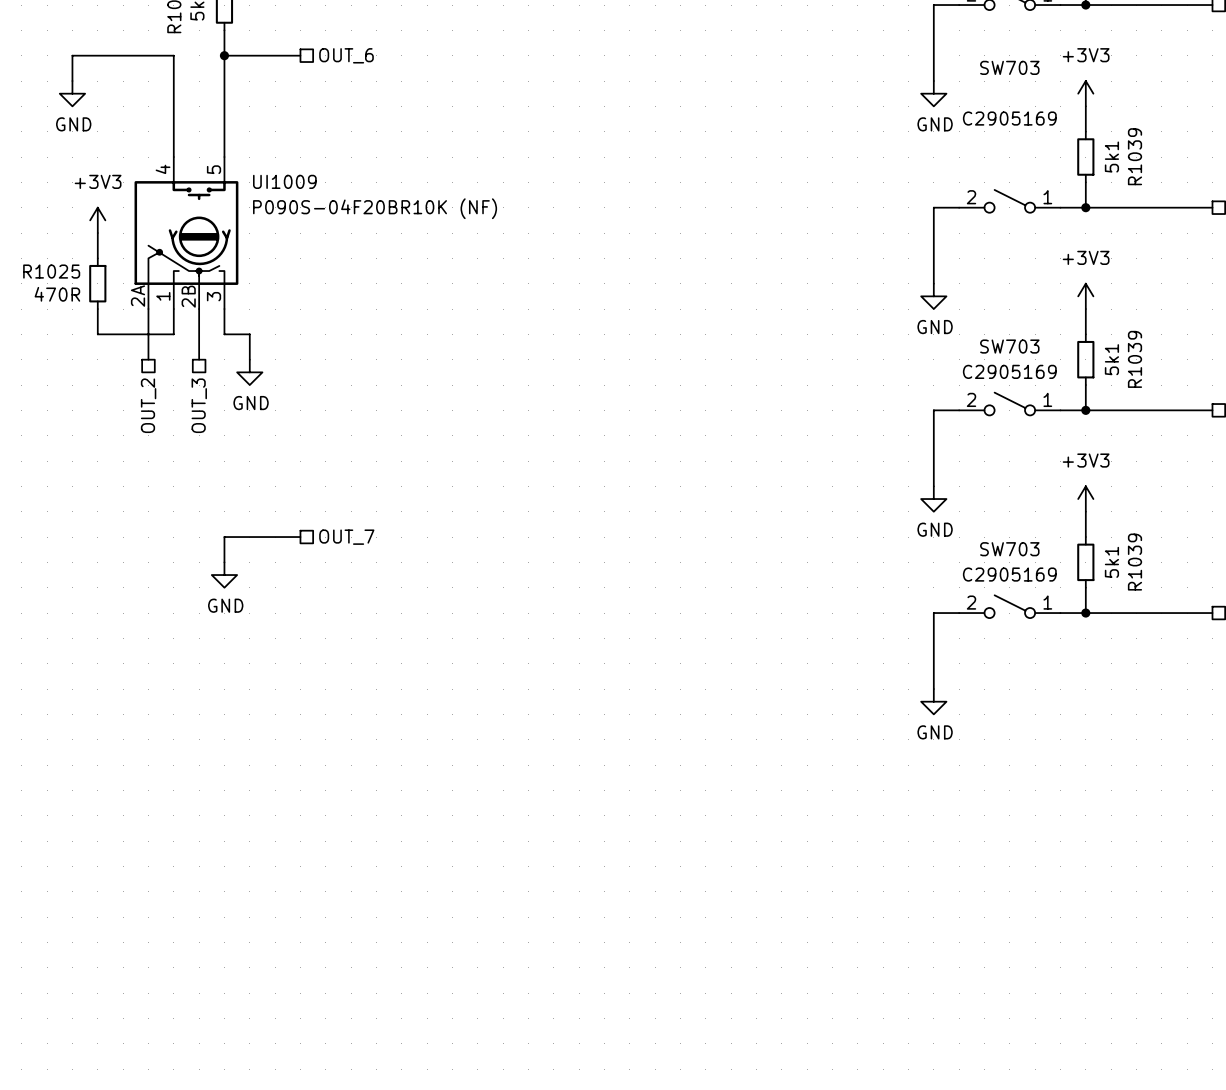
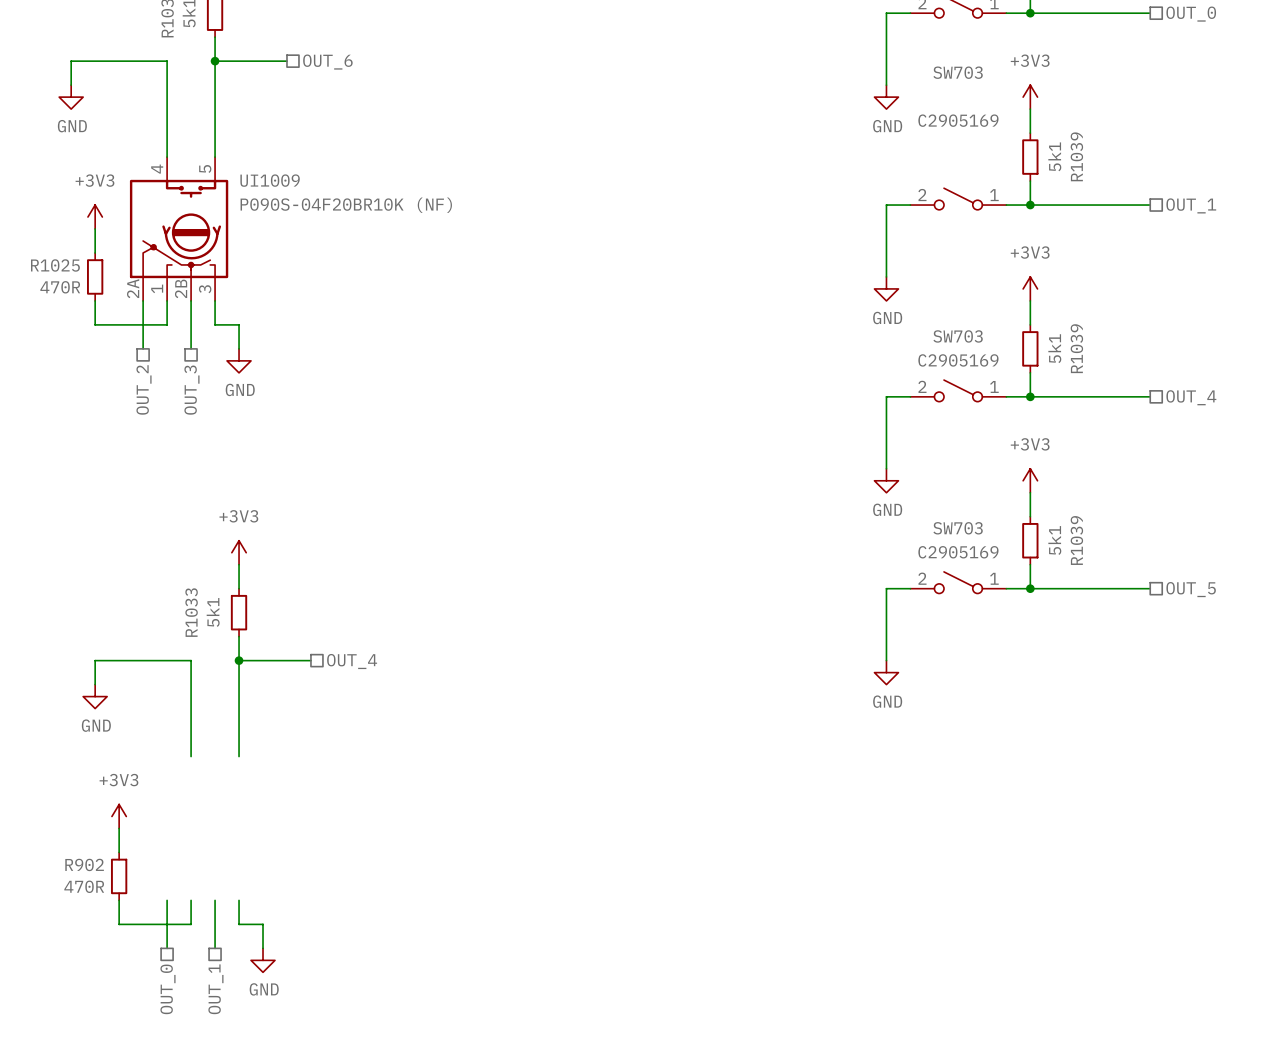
wire: (300, 537) (224, 537) (224, 562) -> none
hierarchical label: OUT_7 (346, 537) -> none
power symbol position: GND (224, 575) -> GND (95, 696)
power symbol: none -> +3V3 (239, 552)
wire: none -> (239, 564) (239, 588)
R1033: none -> 5k1 (239, 612)
wire: none -> (239, 636) (239, 756)
hierarchical label: none -> OUT_4 (352, 661)
wire: none -> (239, 660) (310, 660)
junction: none -> (239, 660)
wire: none -> (95, 684) (95, 660) (191, 660) (191, 756)
power symbol: none -> +3V3 (119, 816)
wire: none -> (119, 828) (119, 852)
R902: none -> 470R (119, 876)
wire: none -> (119, 900) (119, 924) (191, 924) (191, 900)
wire: none -> (167, 900) (167, 948)
wire: none -> (215, 900) (215, 948)
wire: none -> (239, 900) (239, 924) (263, 924) (263, 948)
power symbol: none -> GND (263, 960)
hierarchical label: none -> OUT_0 (167, 989)
hierarchical label: none -> OUT_1 (215, 989)

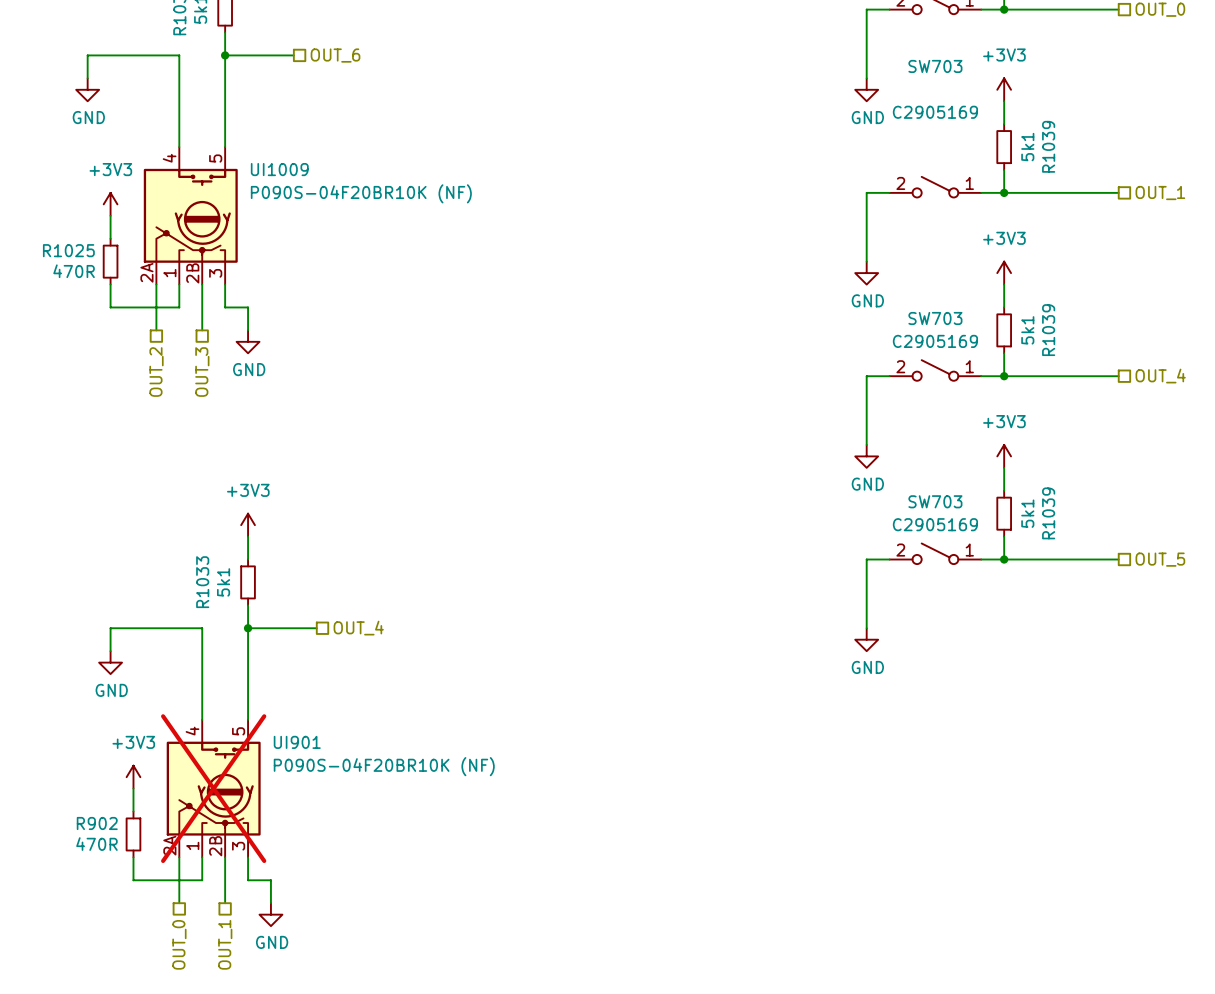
UI901: none -> P090S-04F20BR10K (NF) (213, 788)

